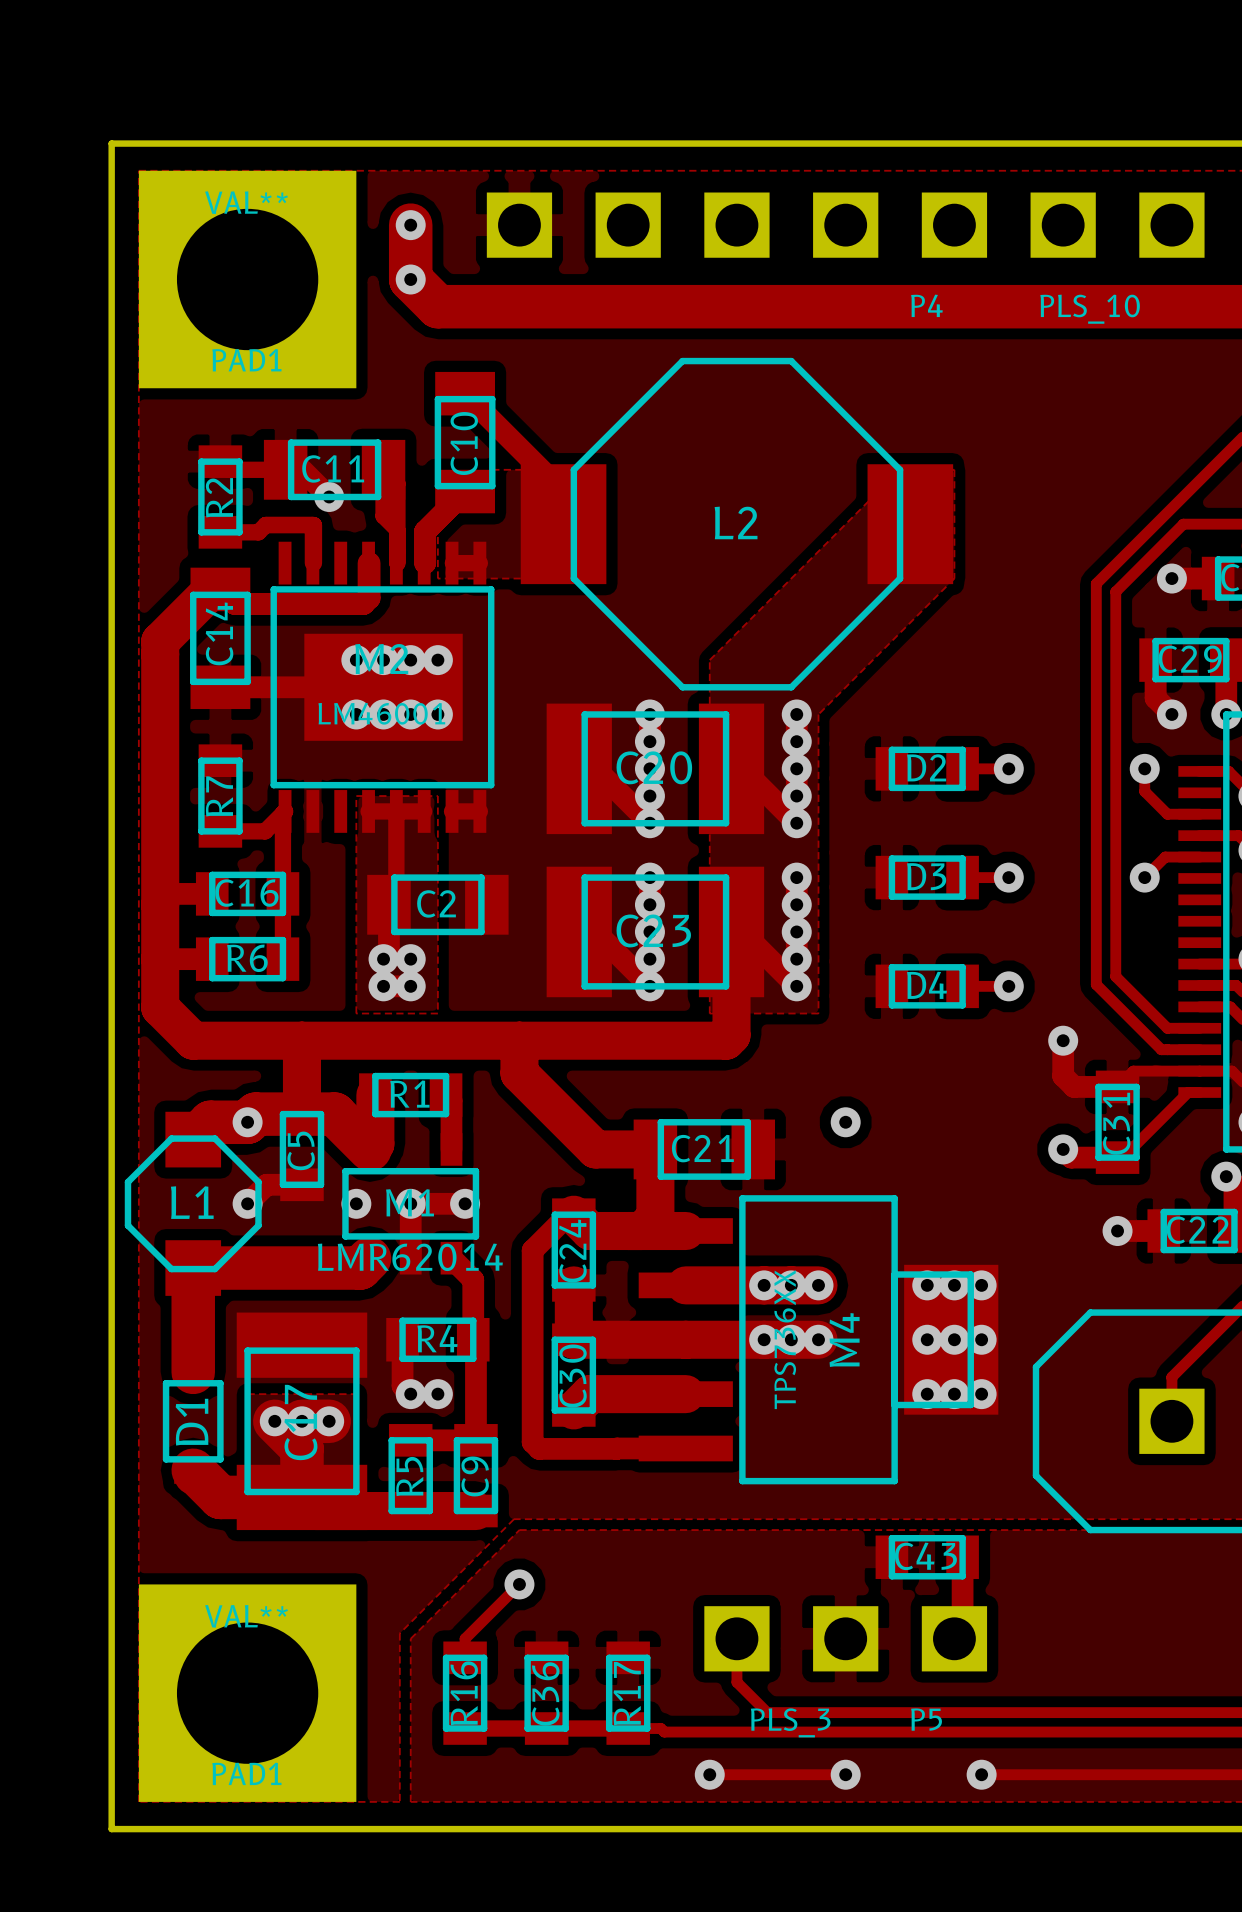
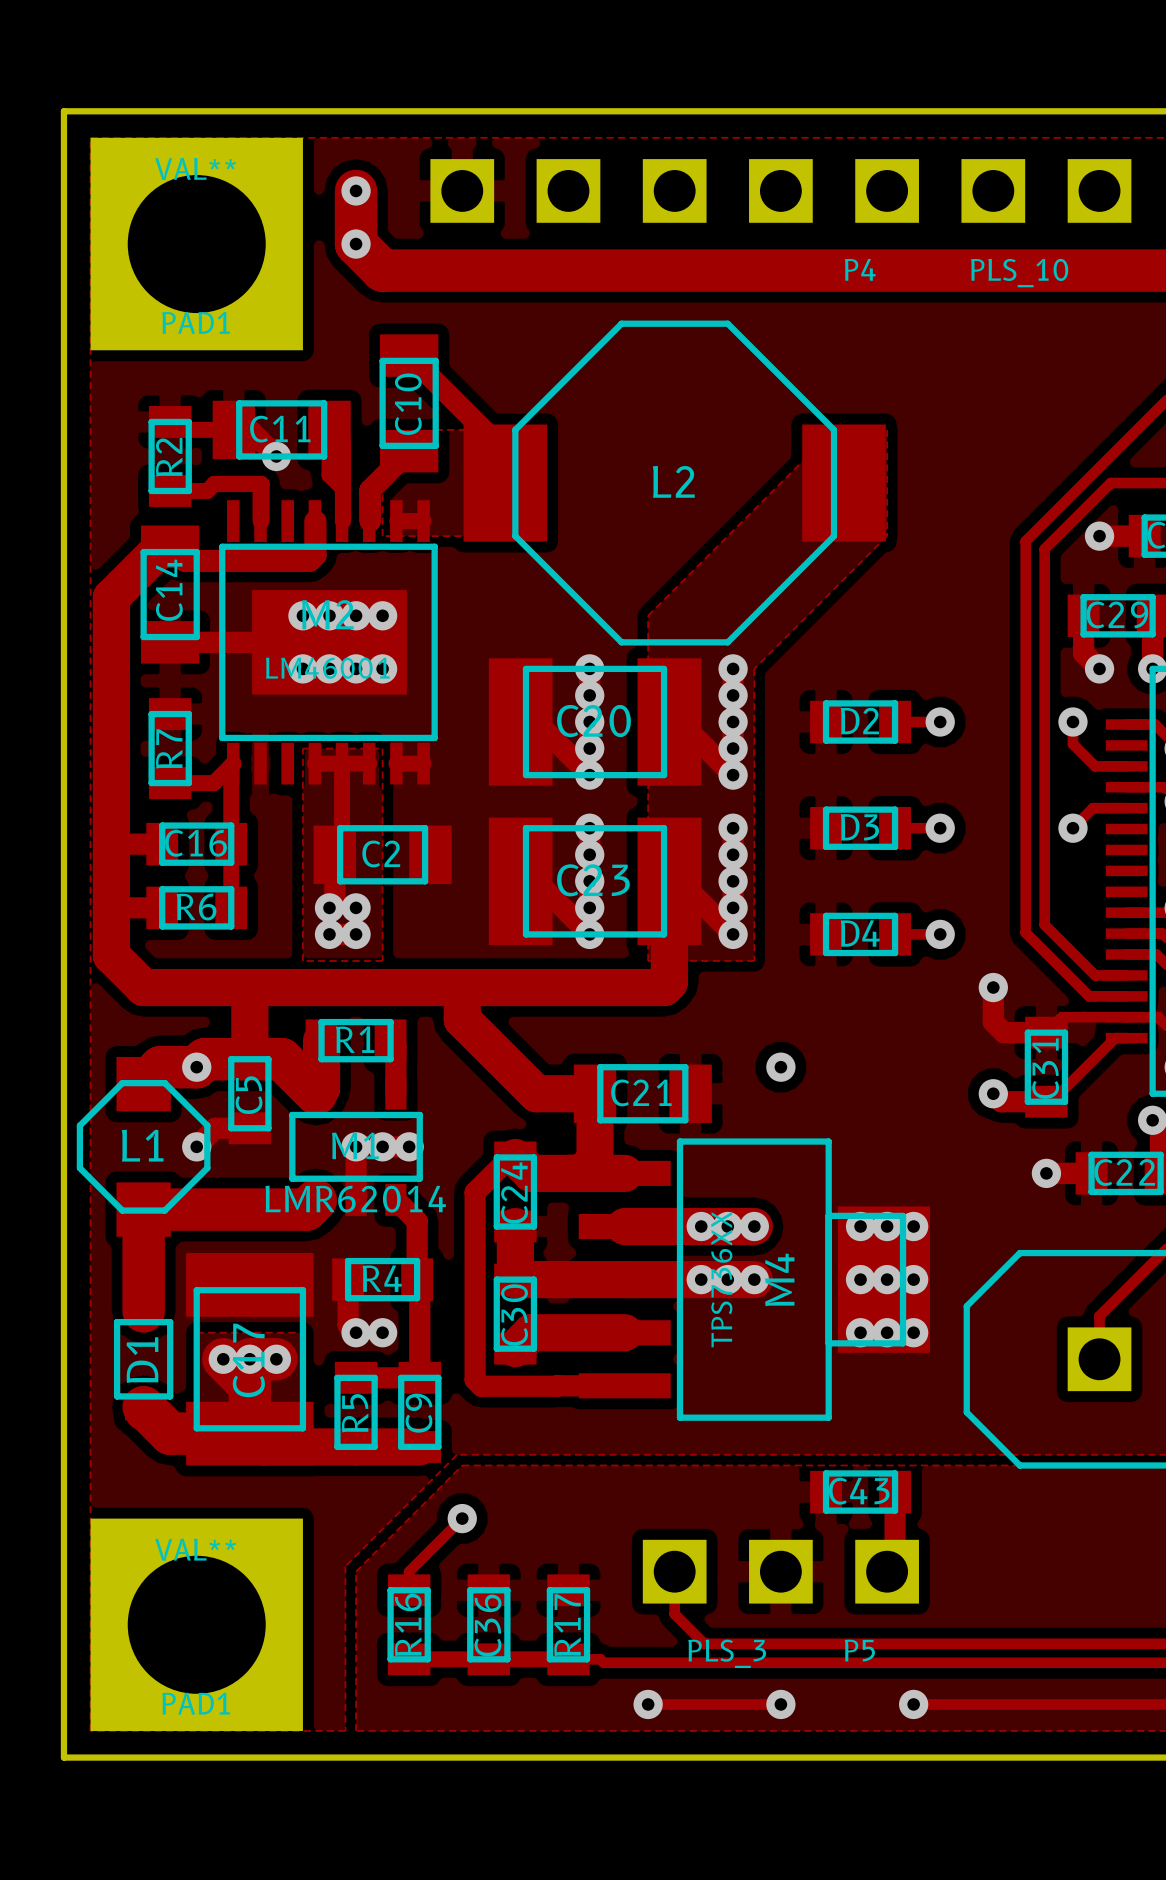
via position: (356, 1203) -> (382, 1146)

